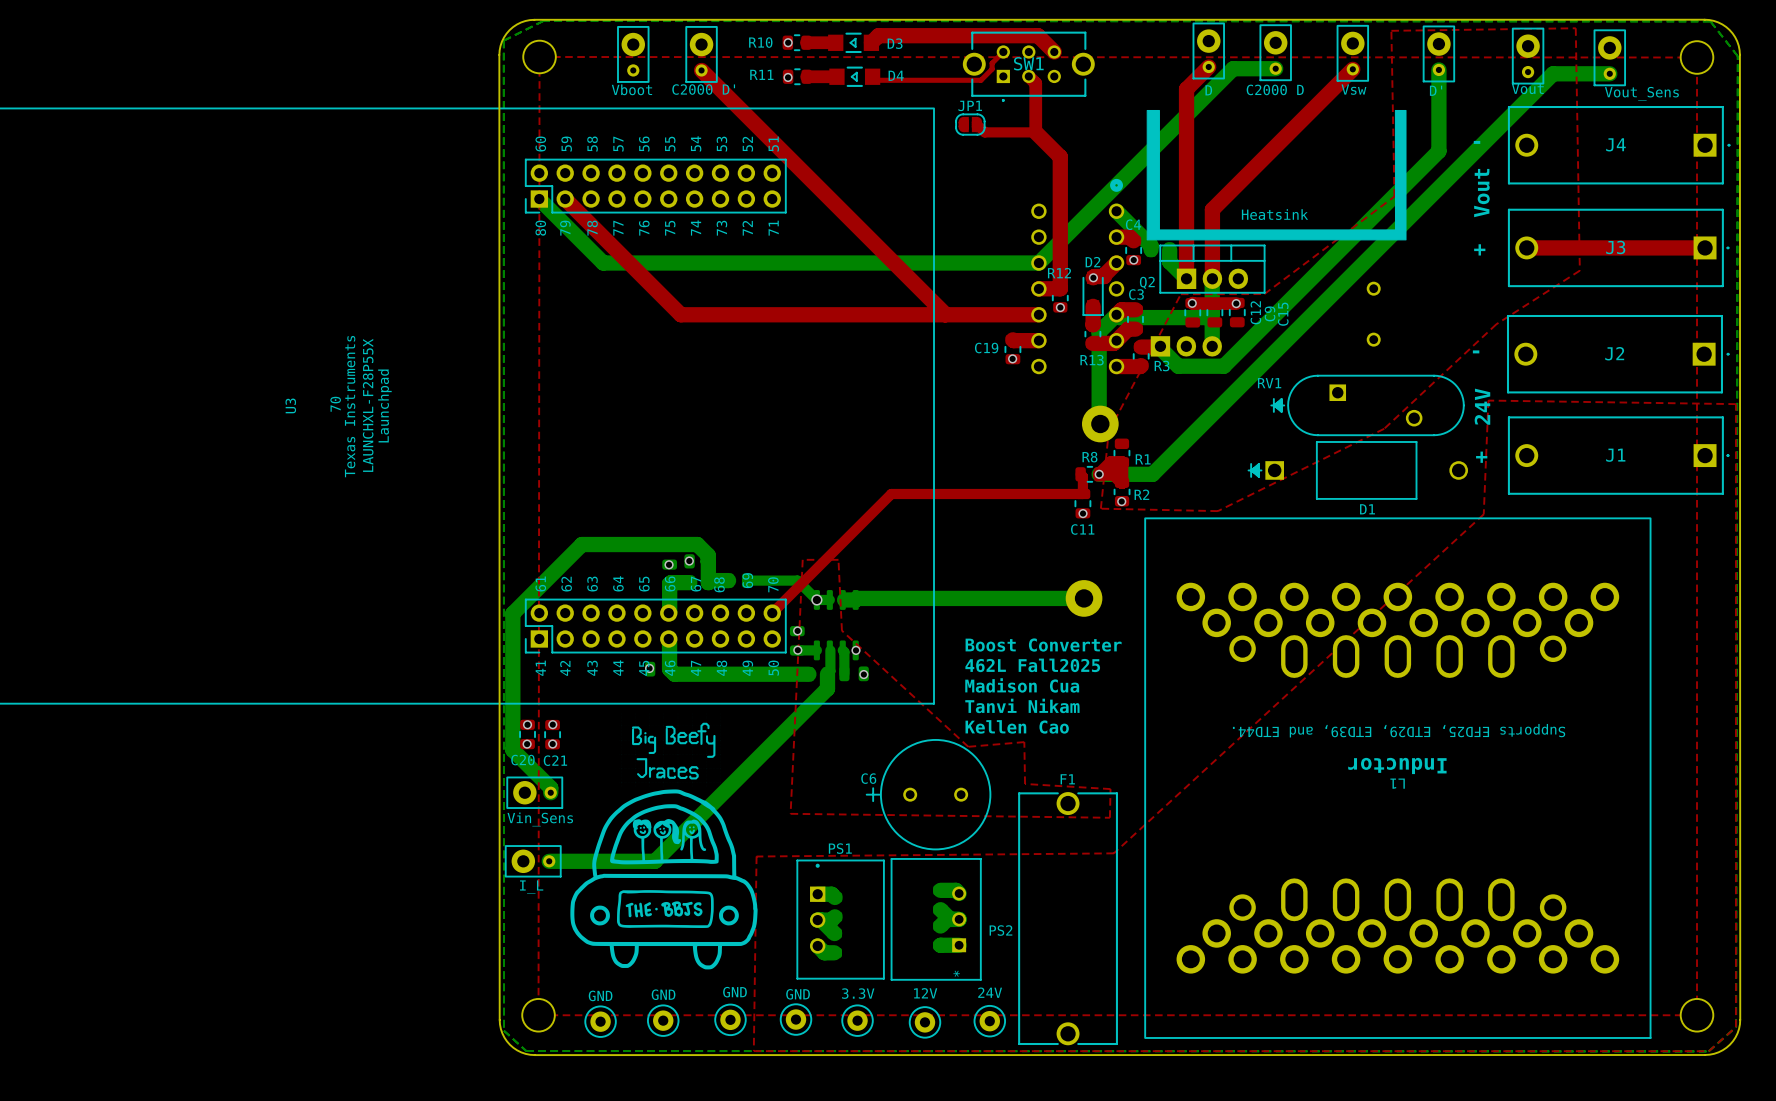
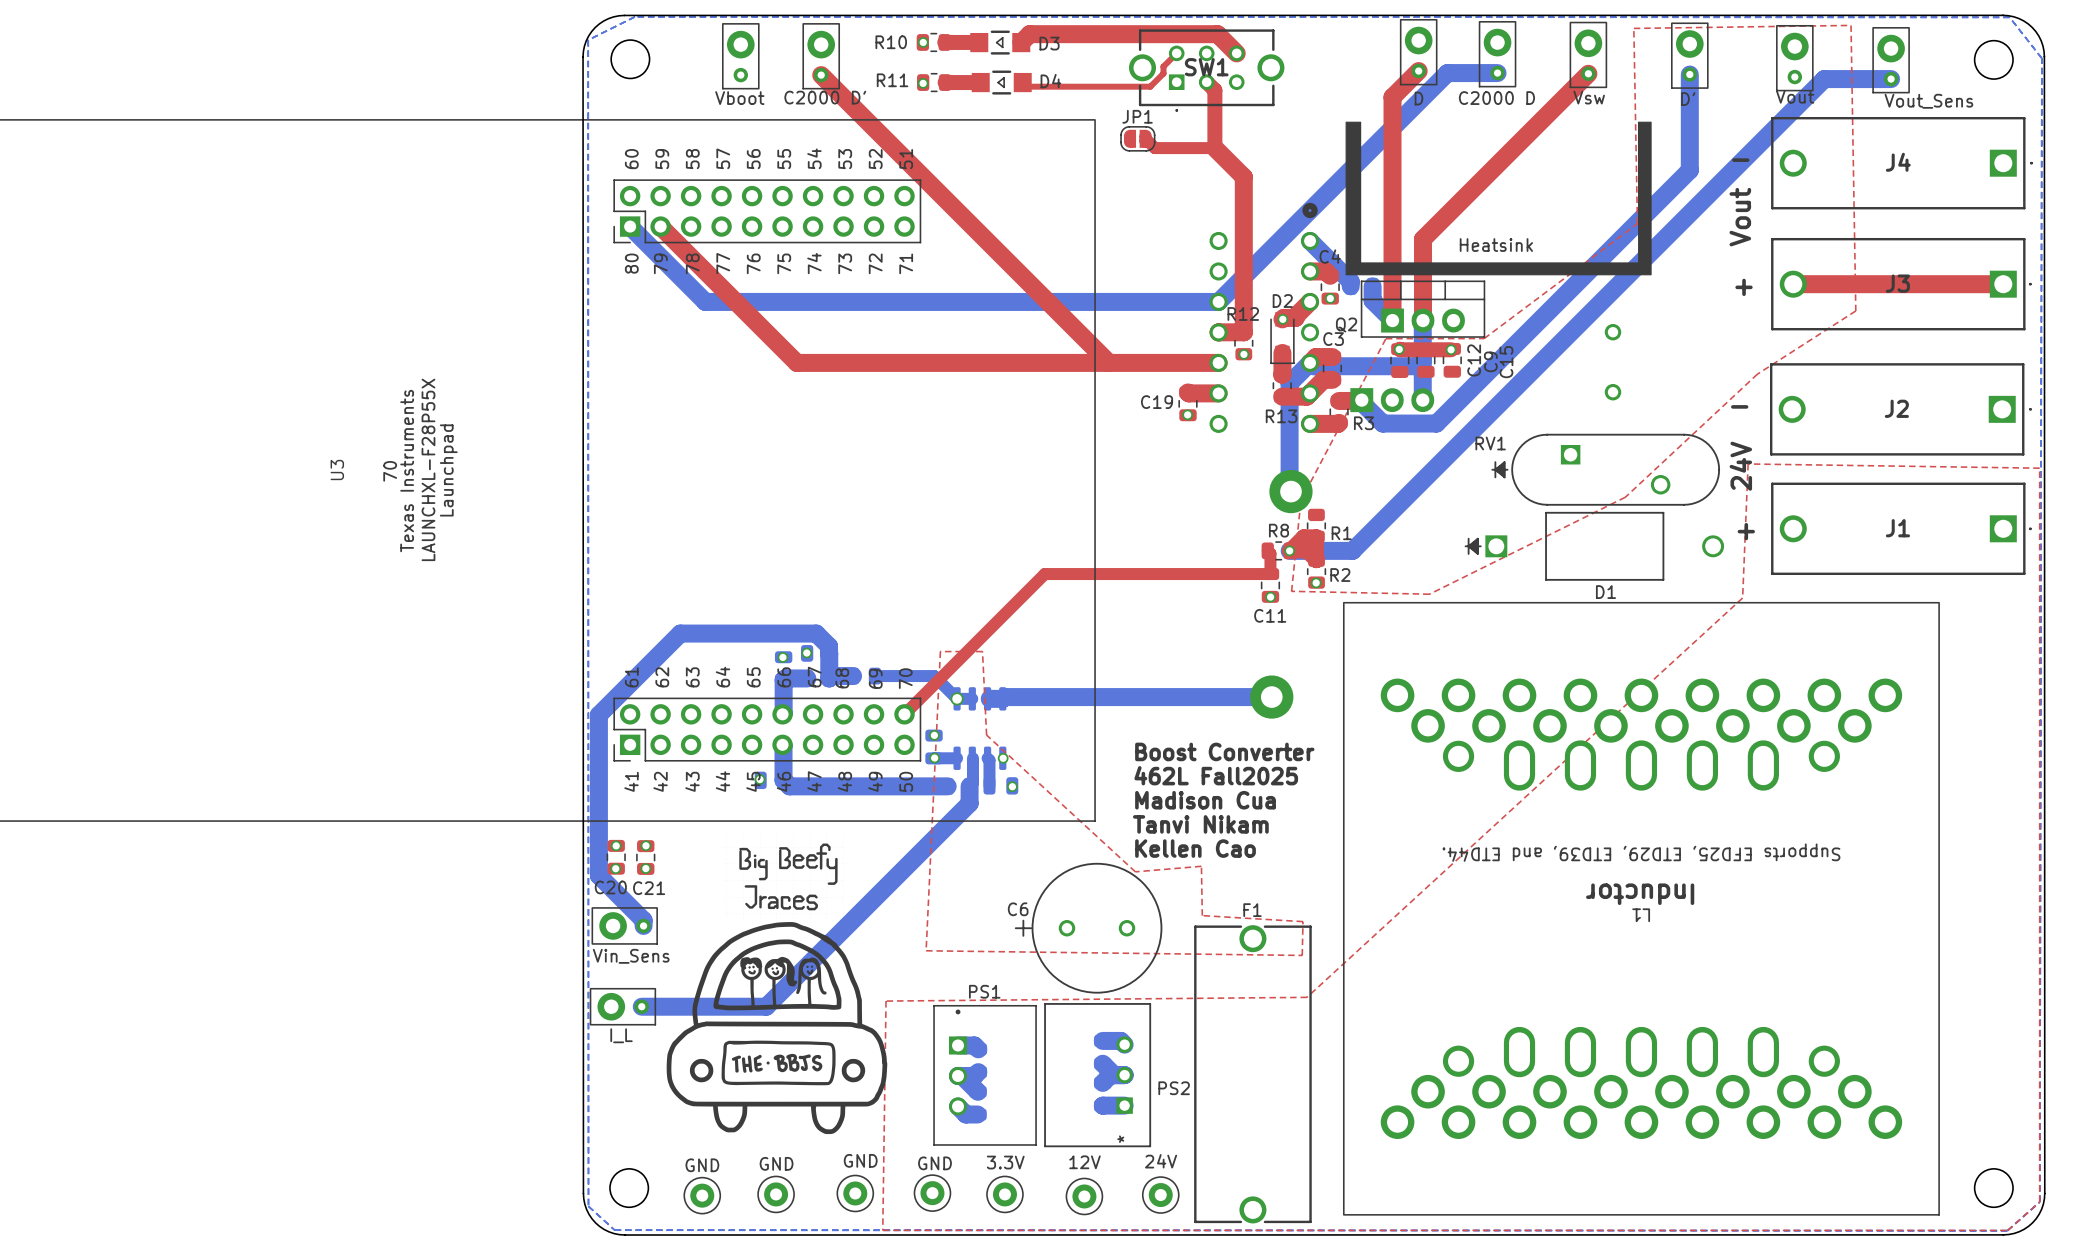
top zone outline: (539, 56) (538, 1015) (1697, 1015) (1697, 57) (539, 56) -> none

